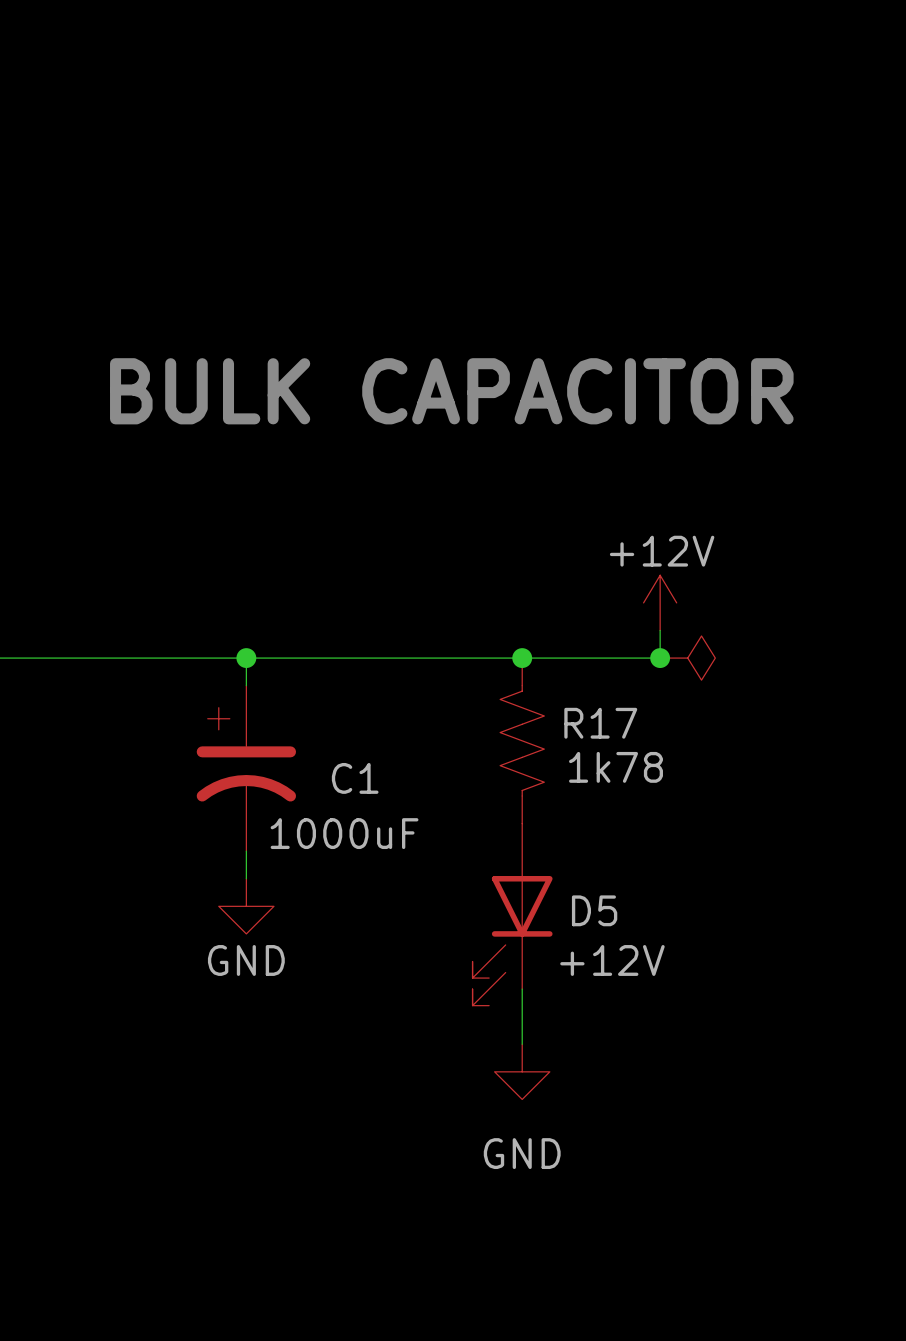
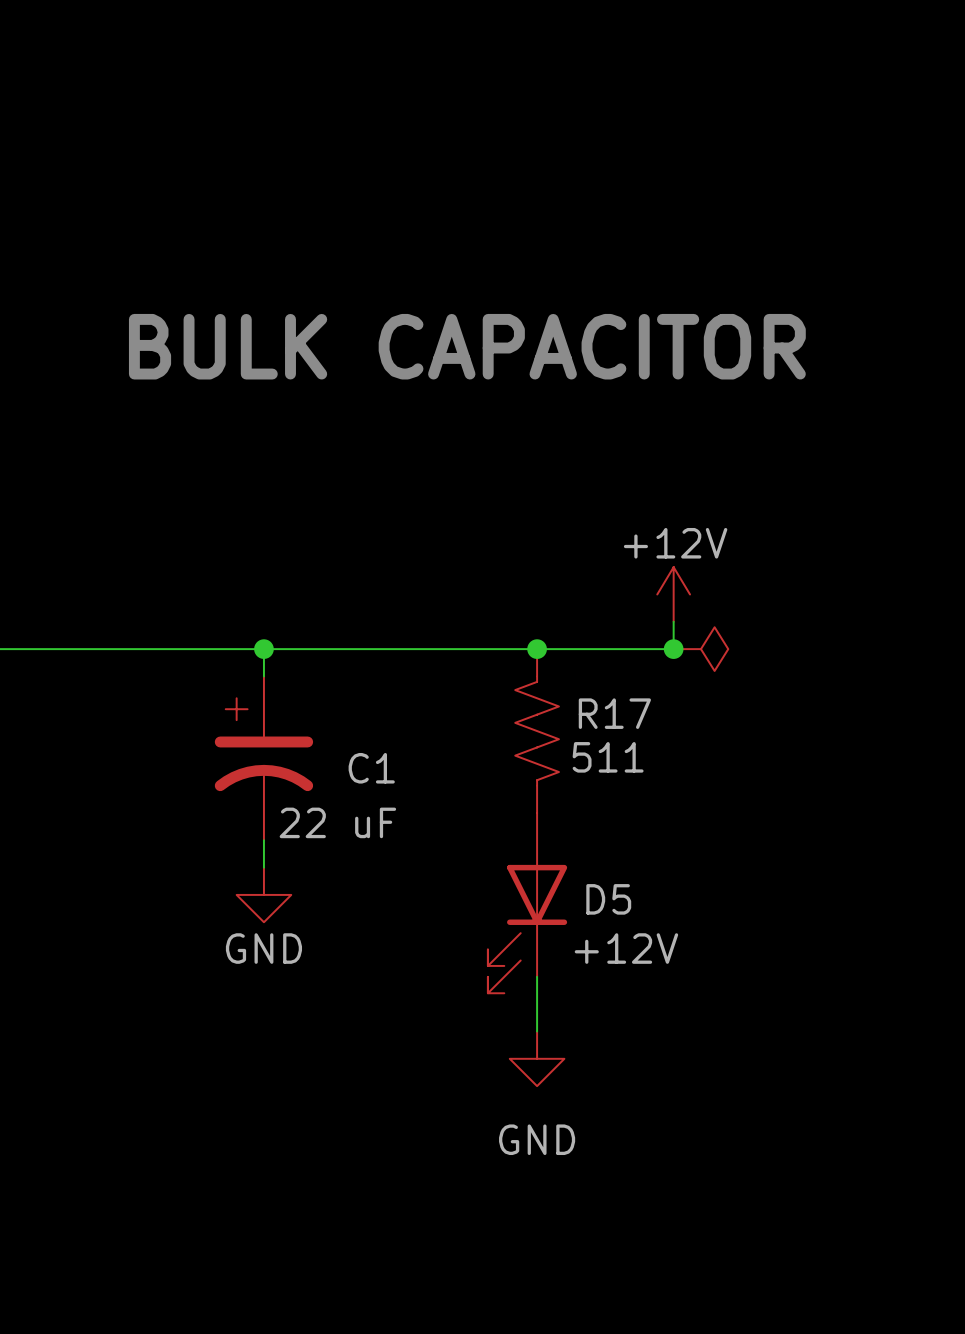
text position: BULK CAPACITOR (451, 391) -> BULK CAPACITOR (467, 346)
R17 value: 1k78 (616, 767) -> 511 (608, 757)
C1 value: 1000uF (344, 833) -> 22 uF (337, 822)

